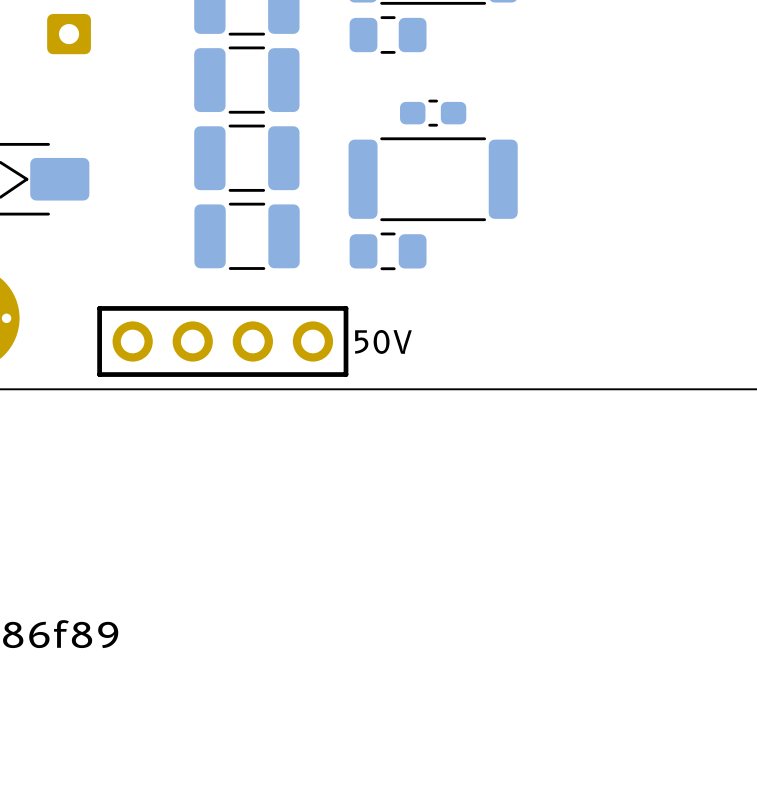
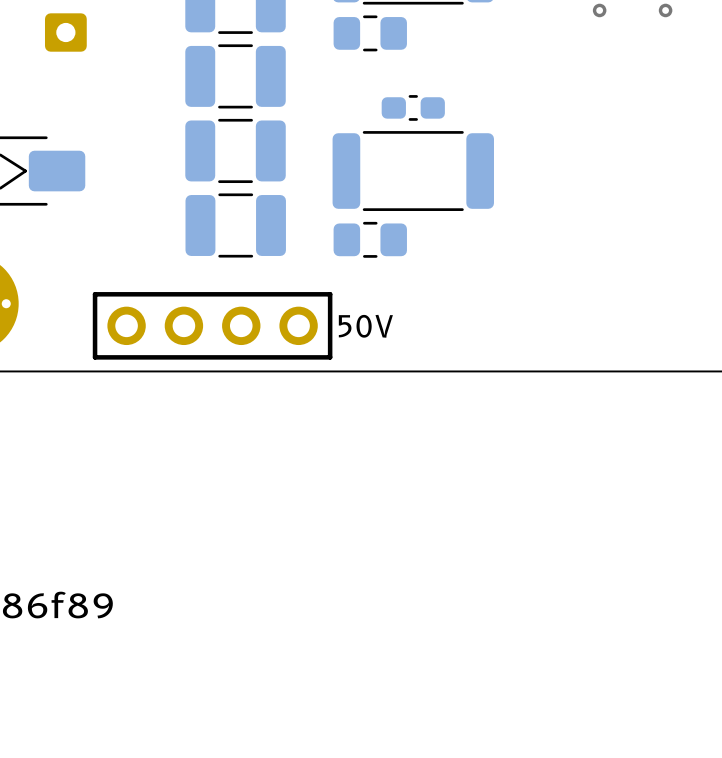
via: none -> (599, 10)
via: none -> (665, 10)

